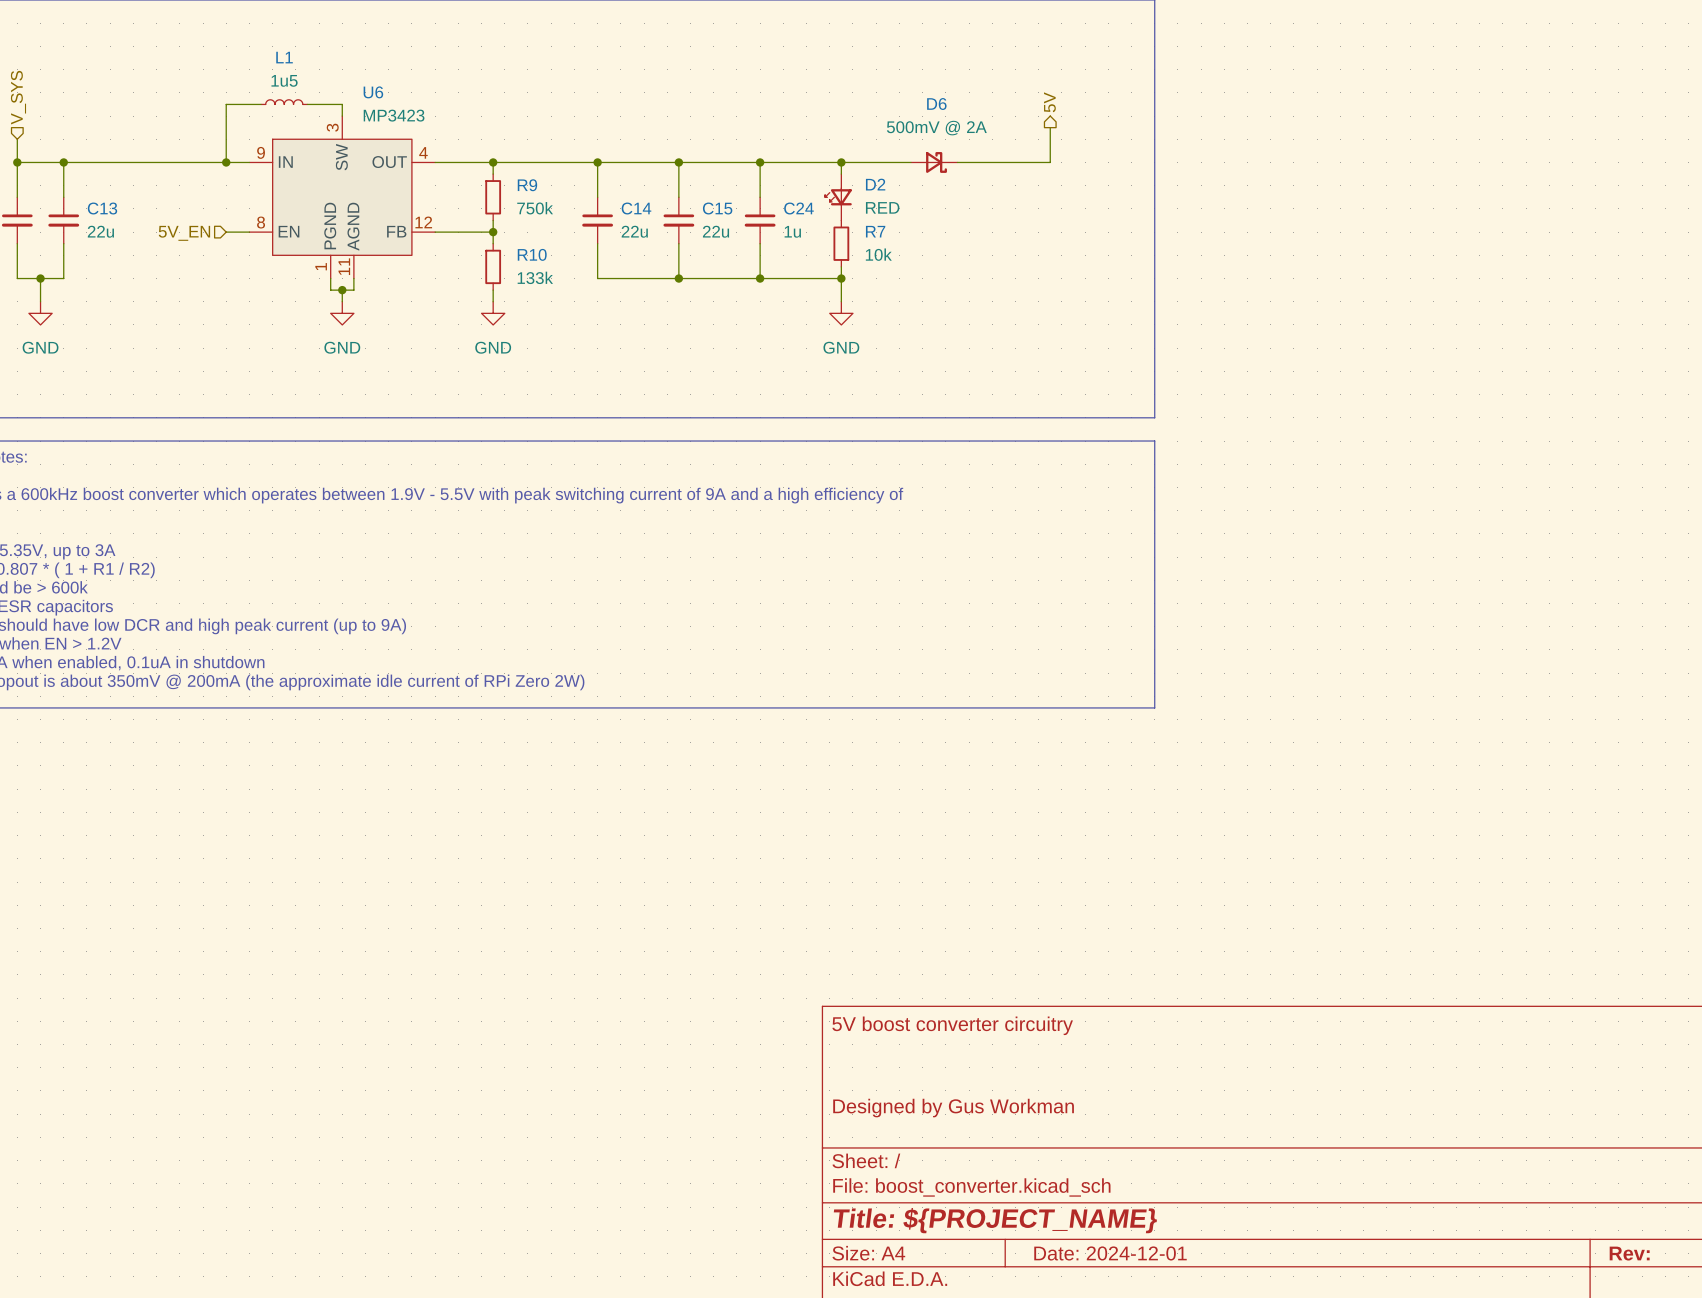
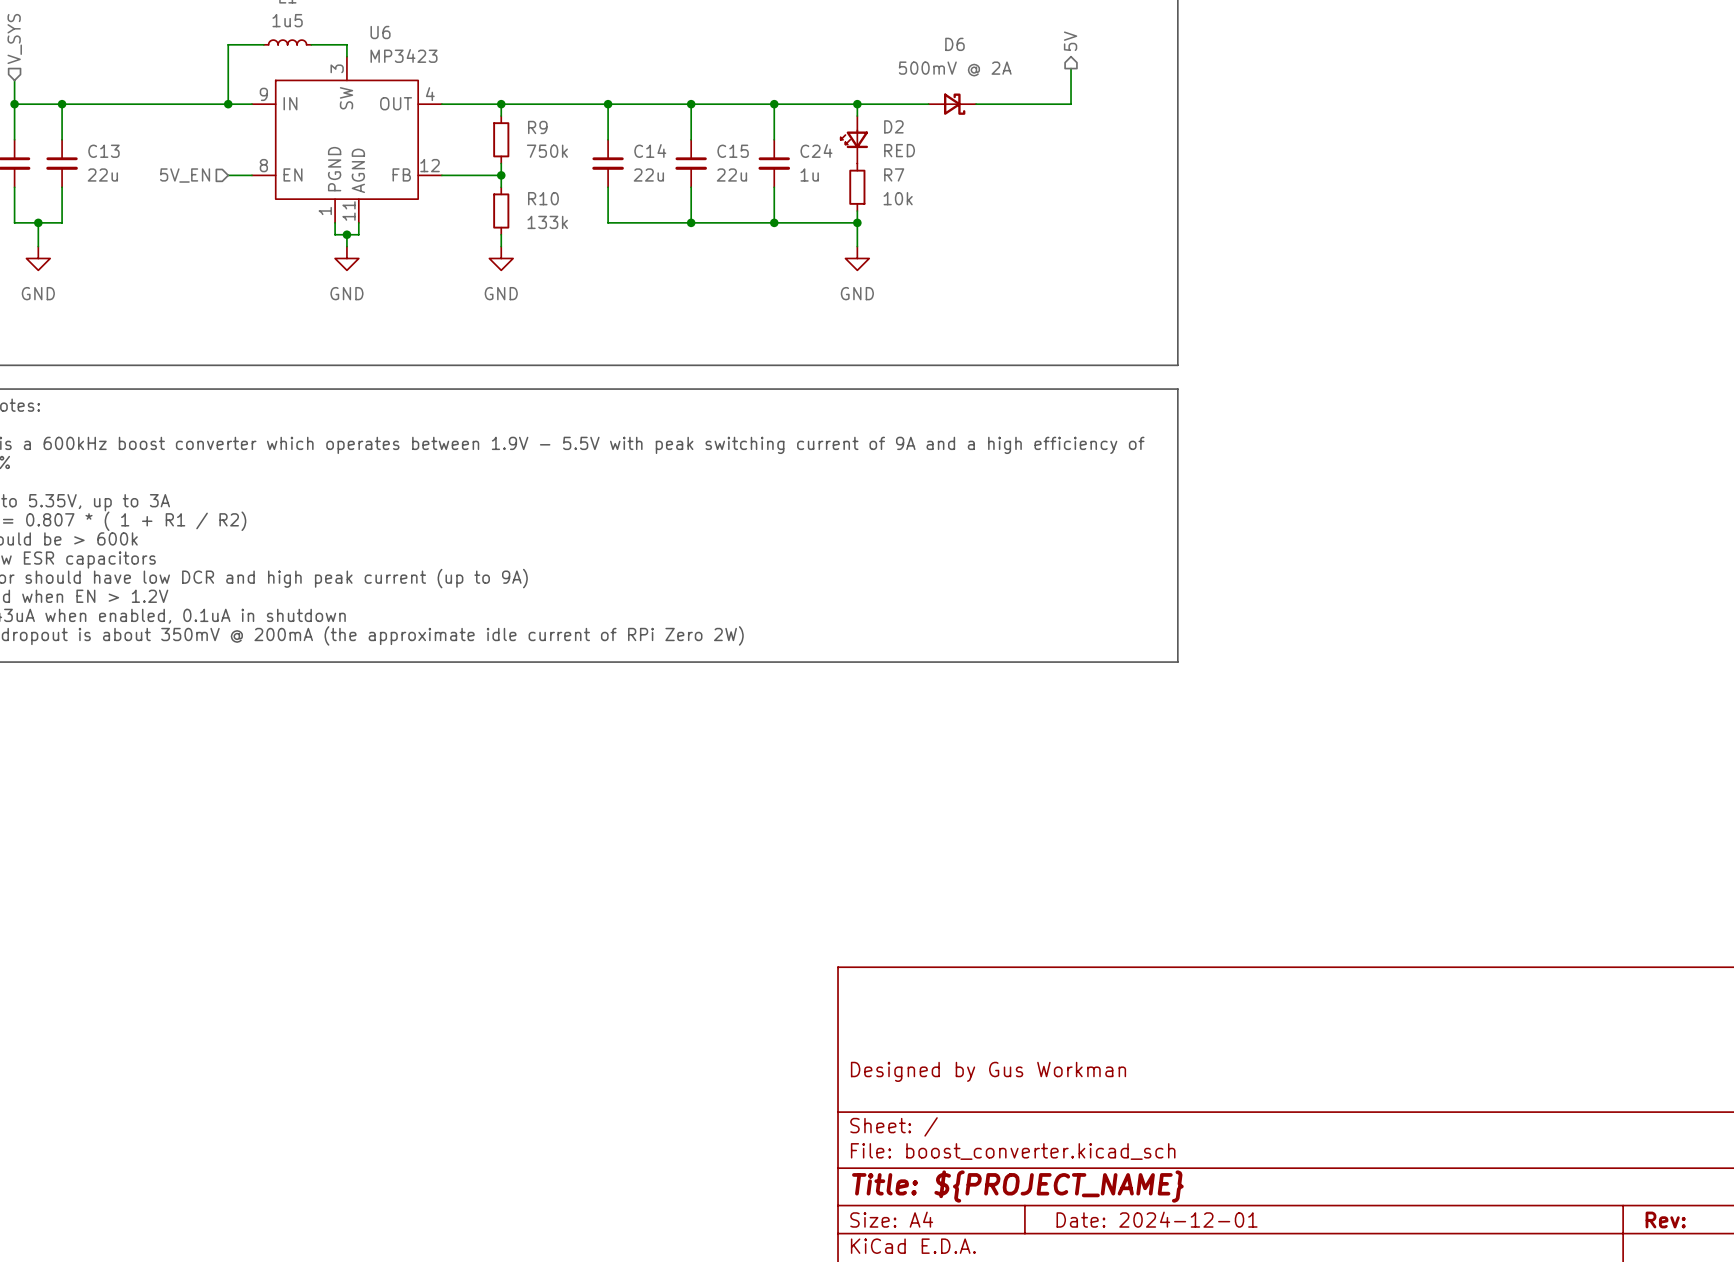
title block: 5V boost converter circuitry (952, 1025) -> none

